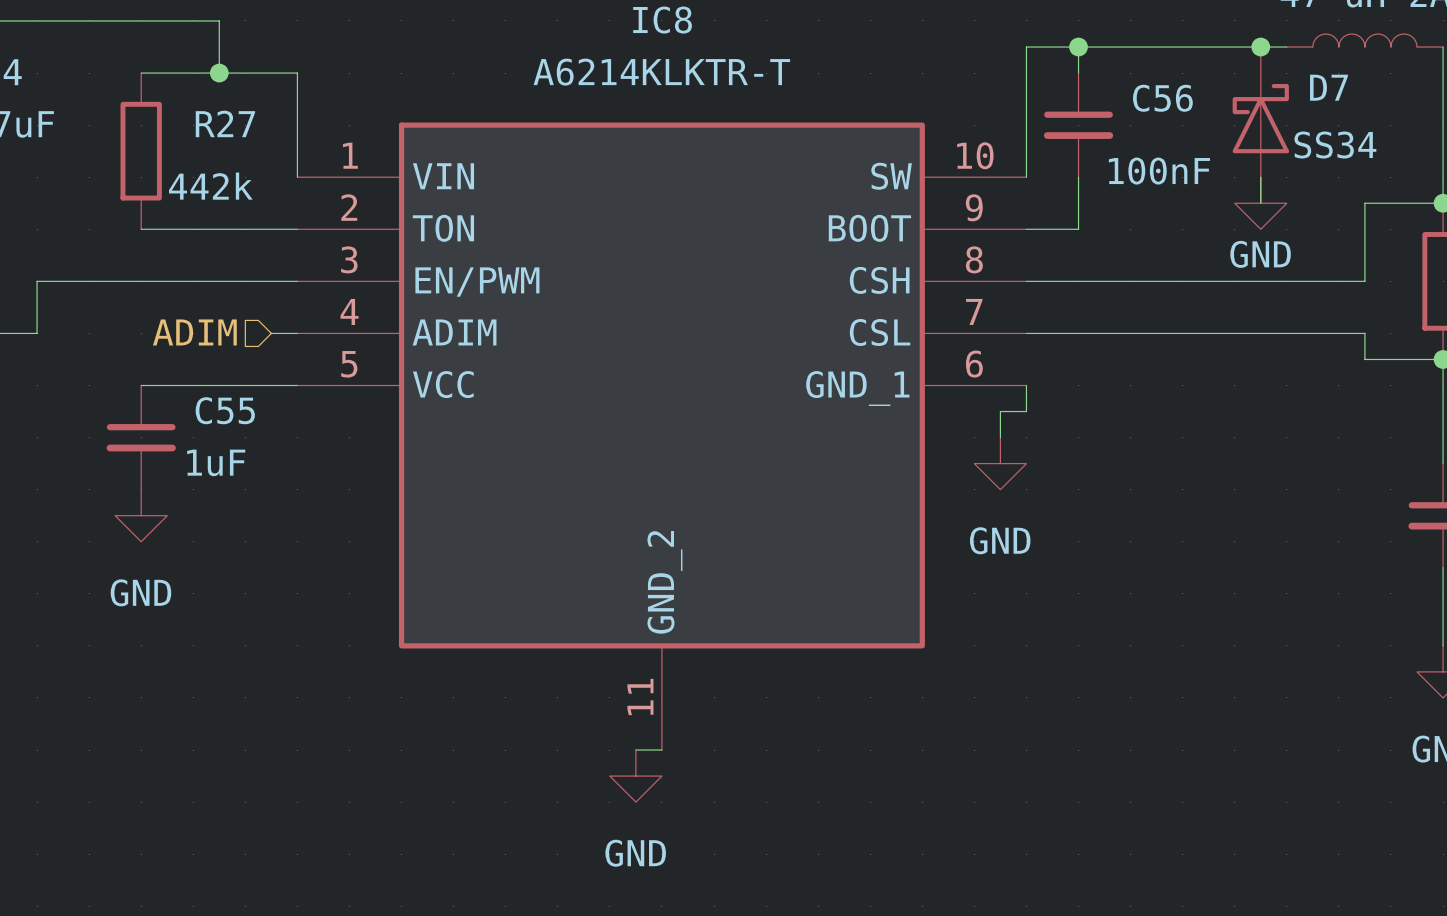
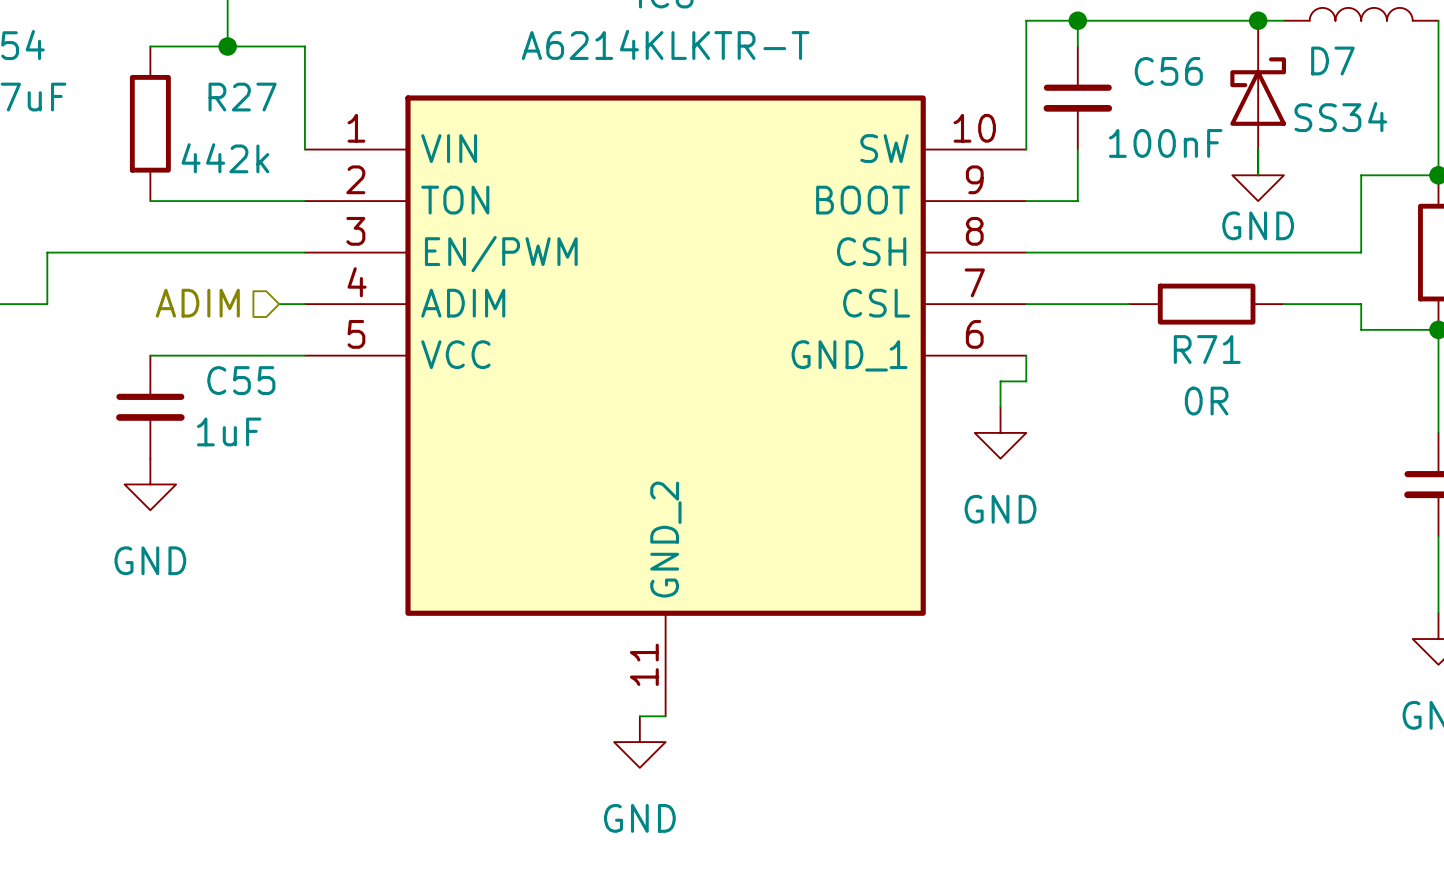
wire: (1130, 333) (1286, 333) -> none
R71: none -> 0R (1206, 304)

